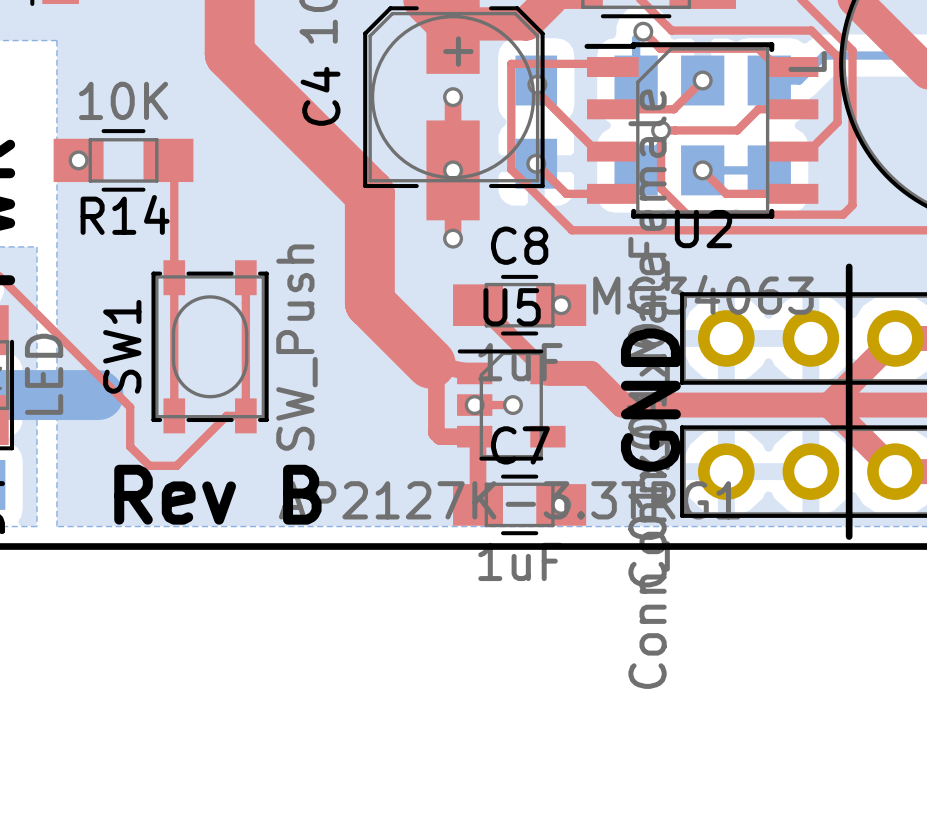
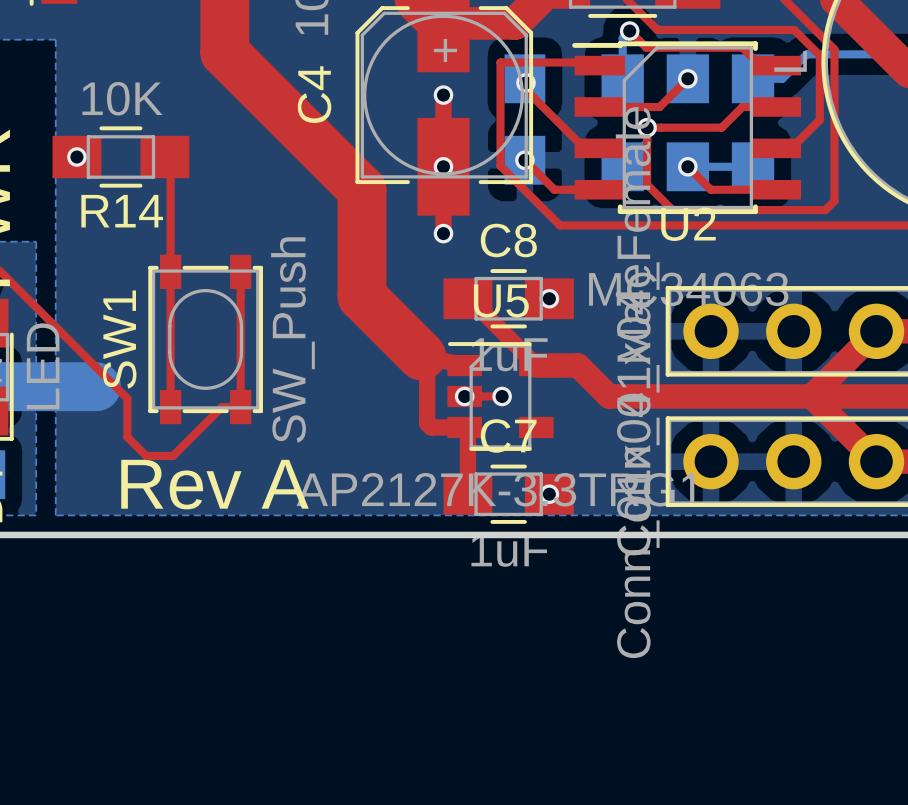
line: (849, 266) (849, 536) -> none
text: GND (650, 400) -> none
text: Rev B (217, 494) -> Rev A (214, 484)

